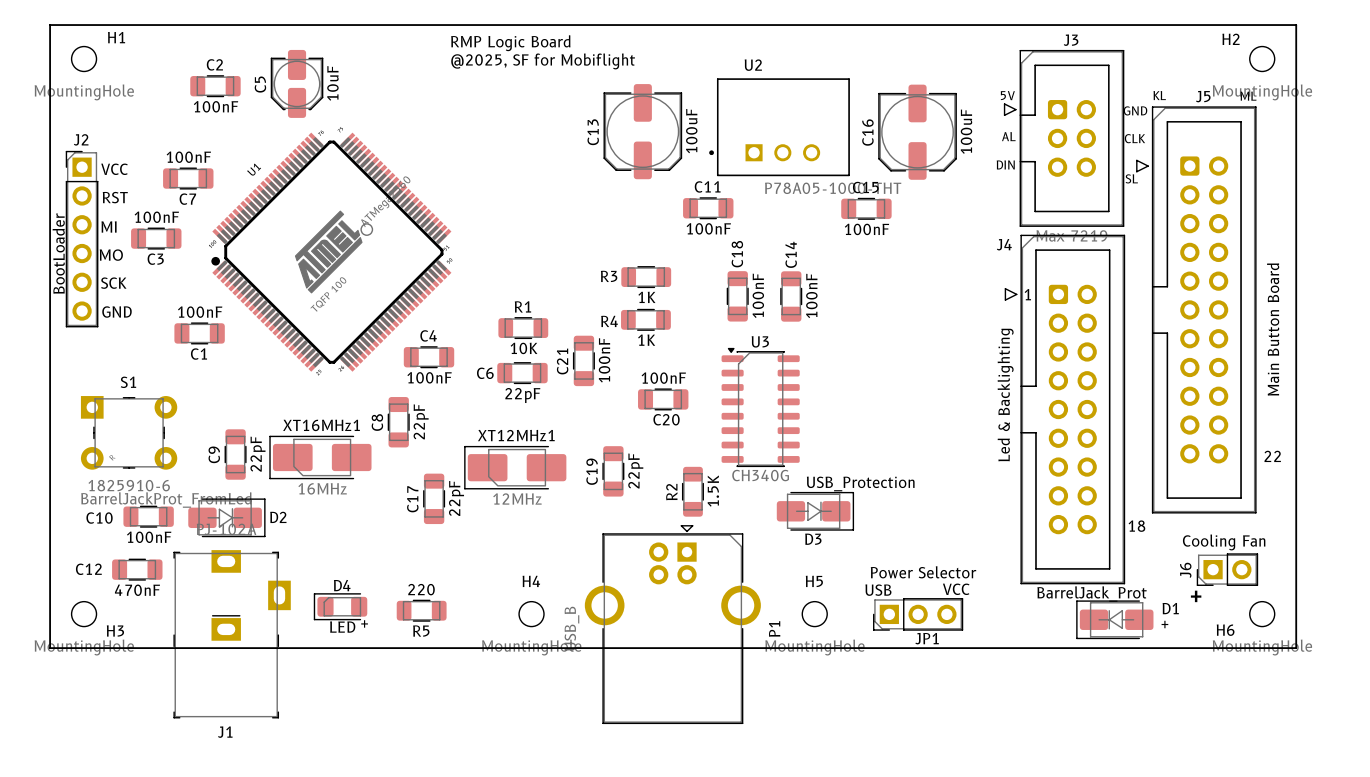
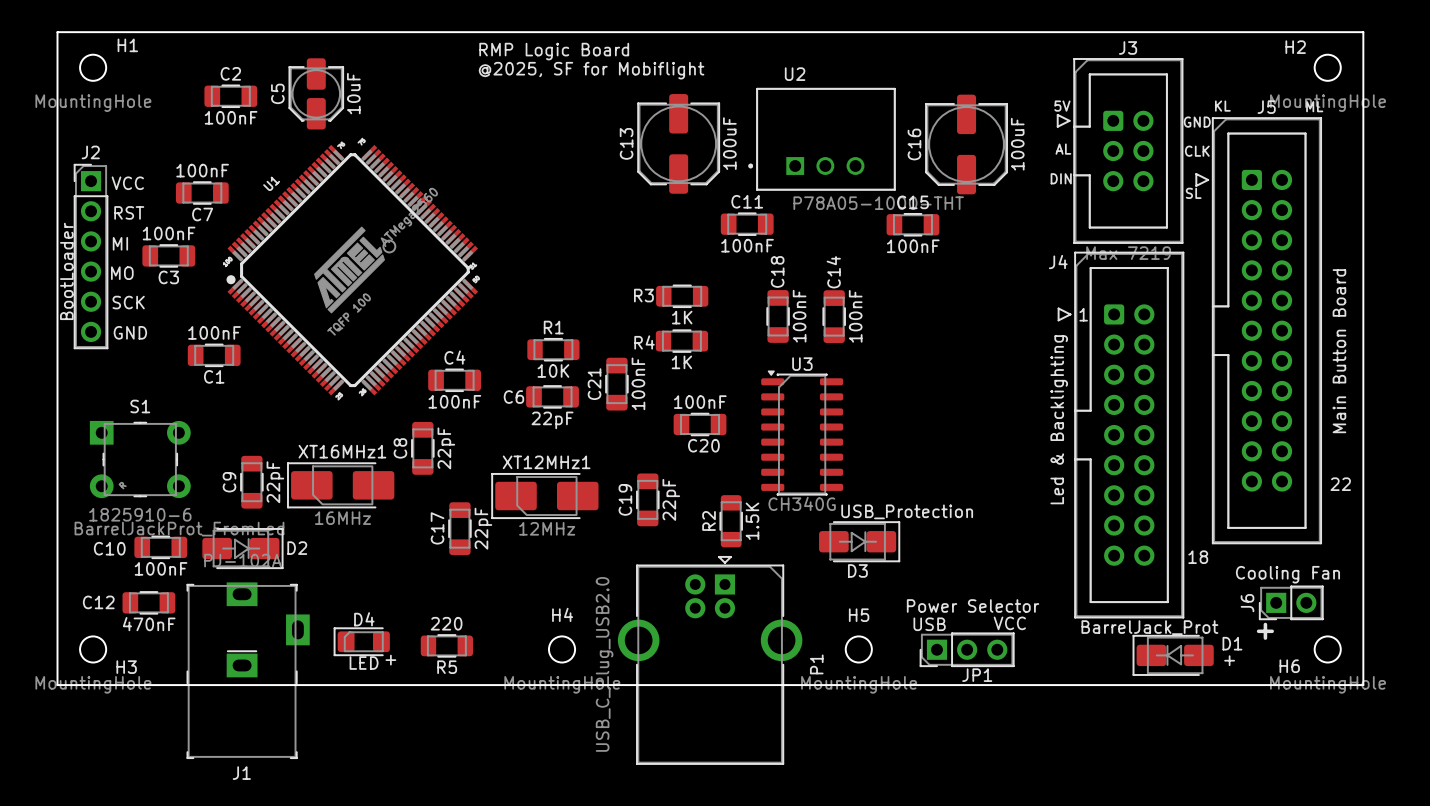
P1 value: USB_B (571, 628) -> USB_C_Plug_USB2.0 (604, 664)

